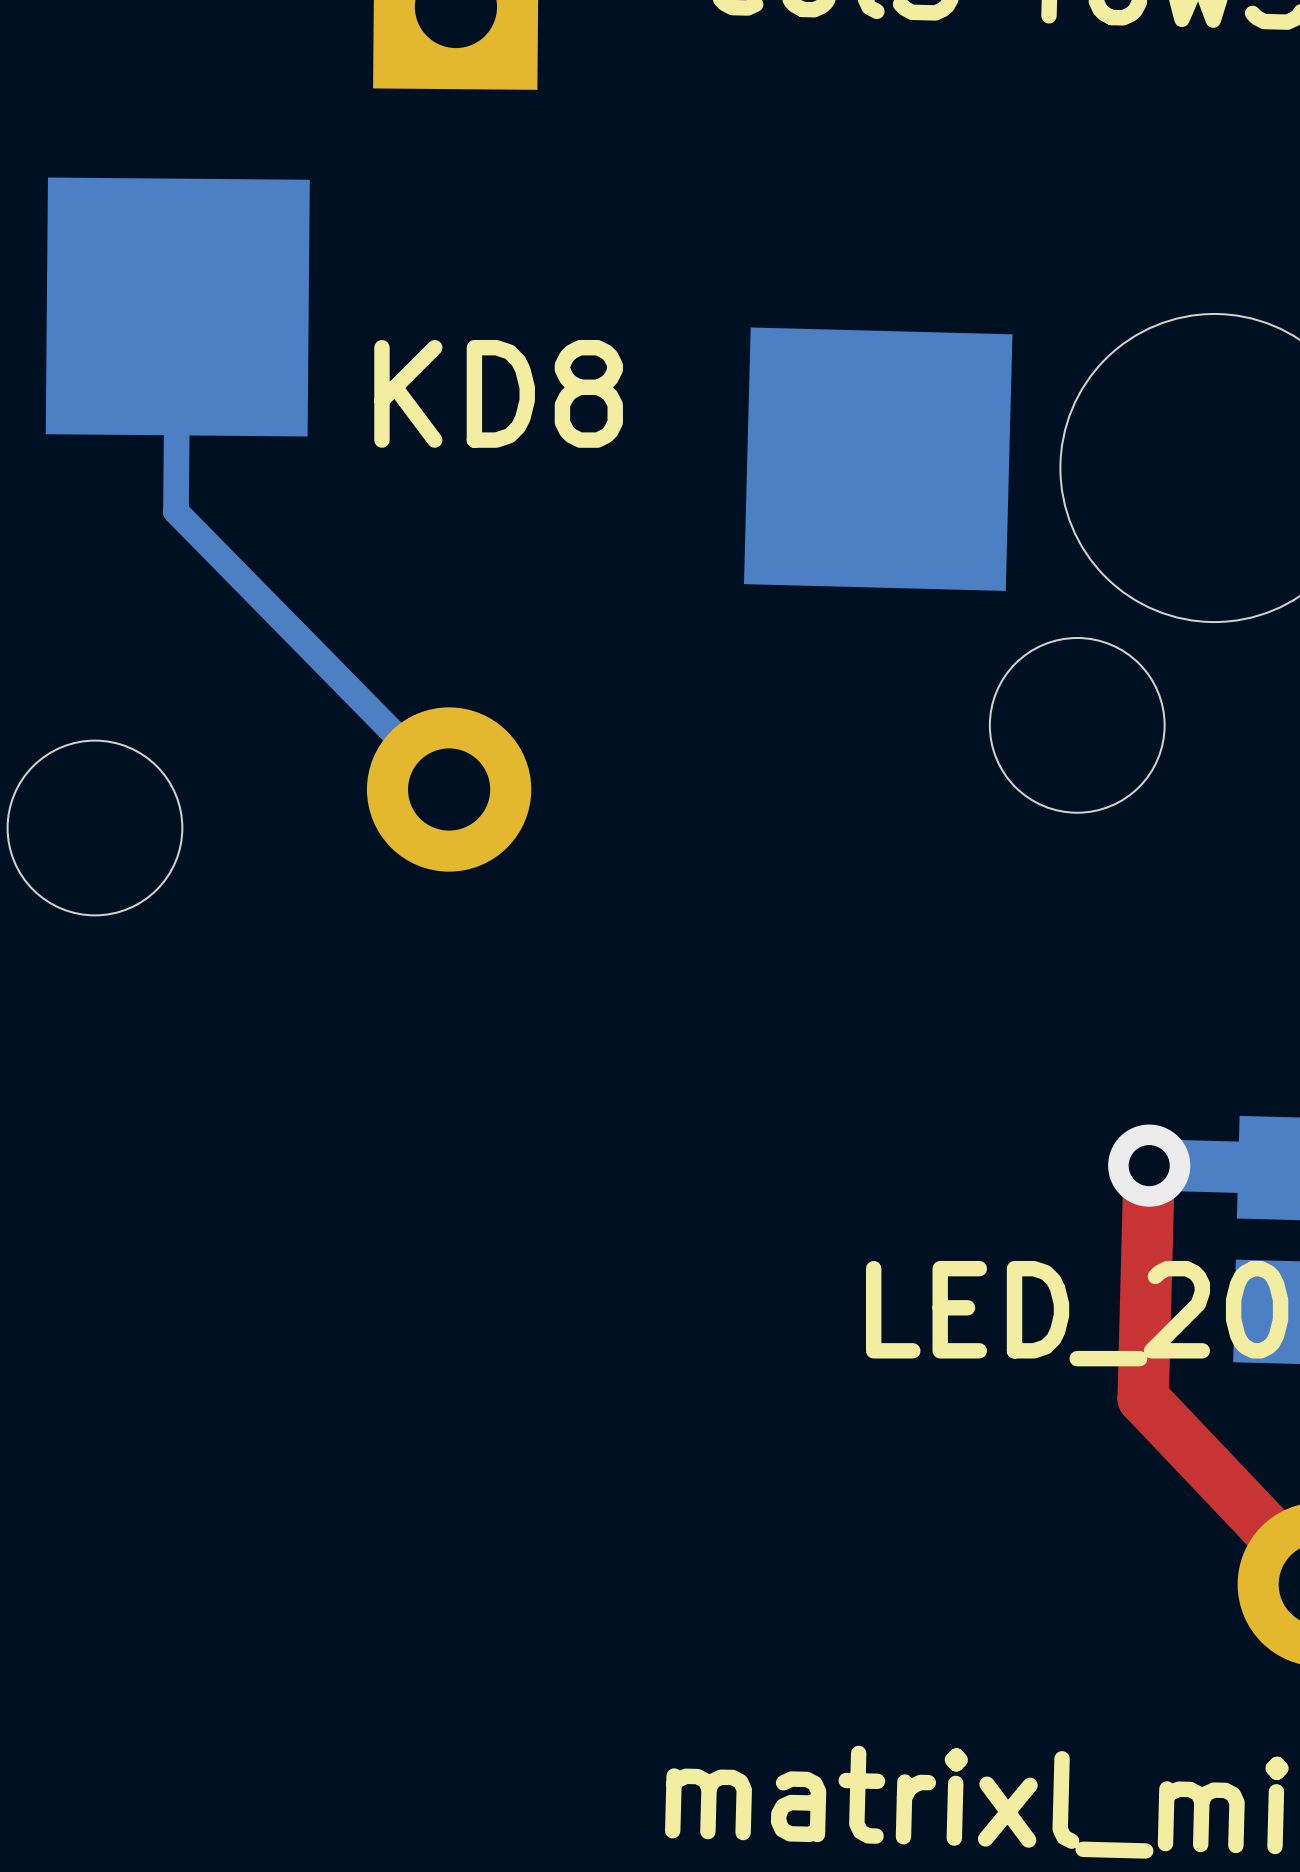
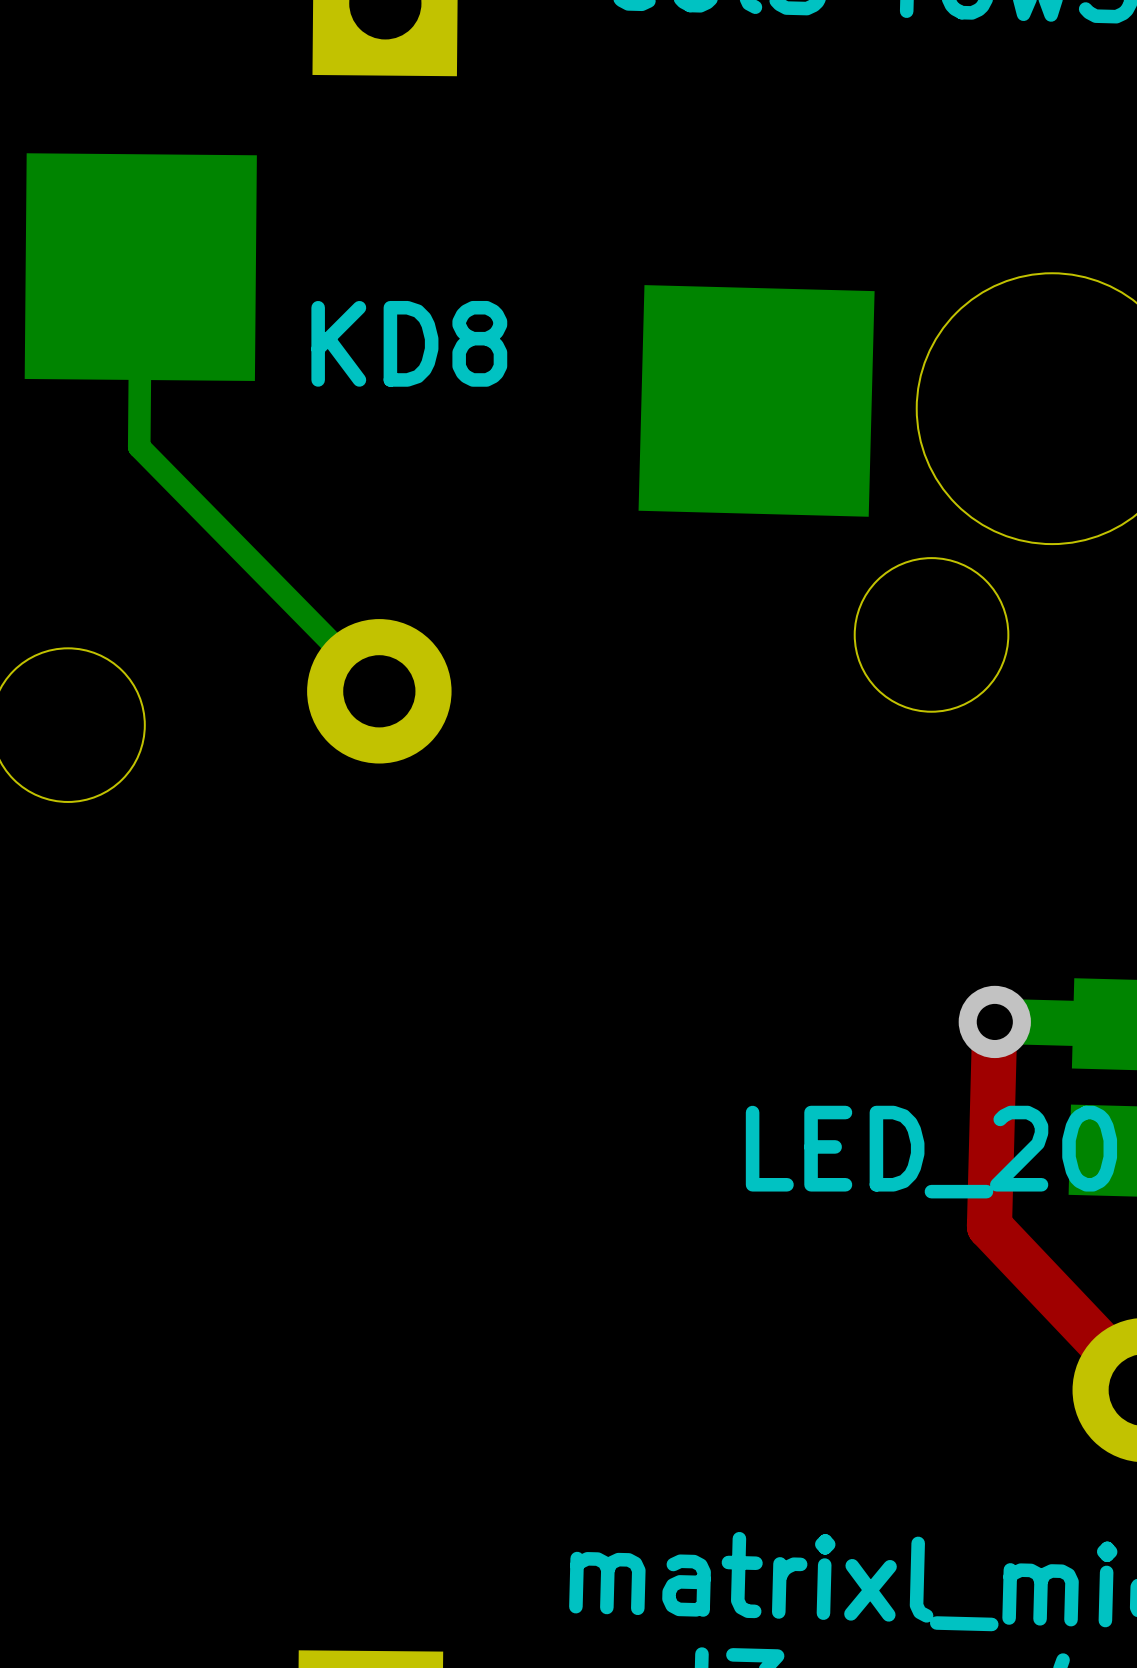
text position: KD8 (498, 393) -> KD8 (409, 343)

